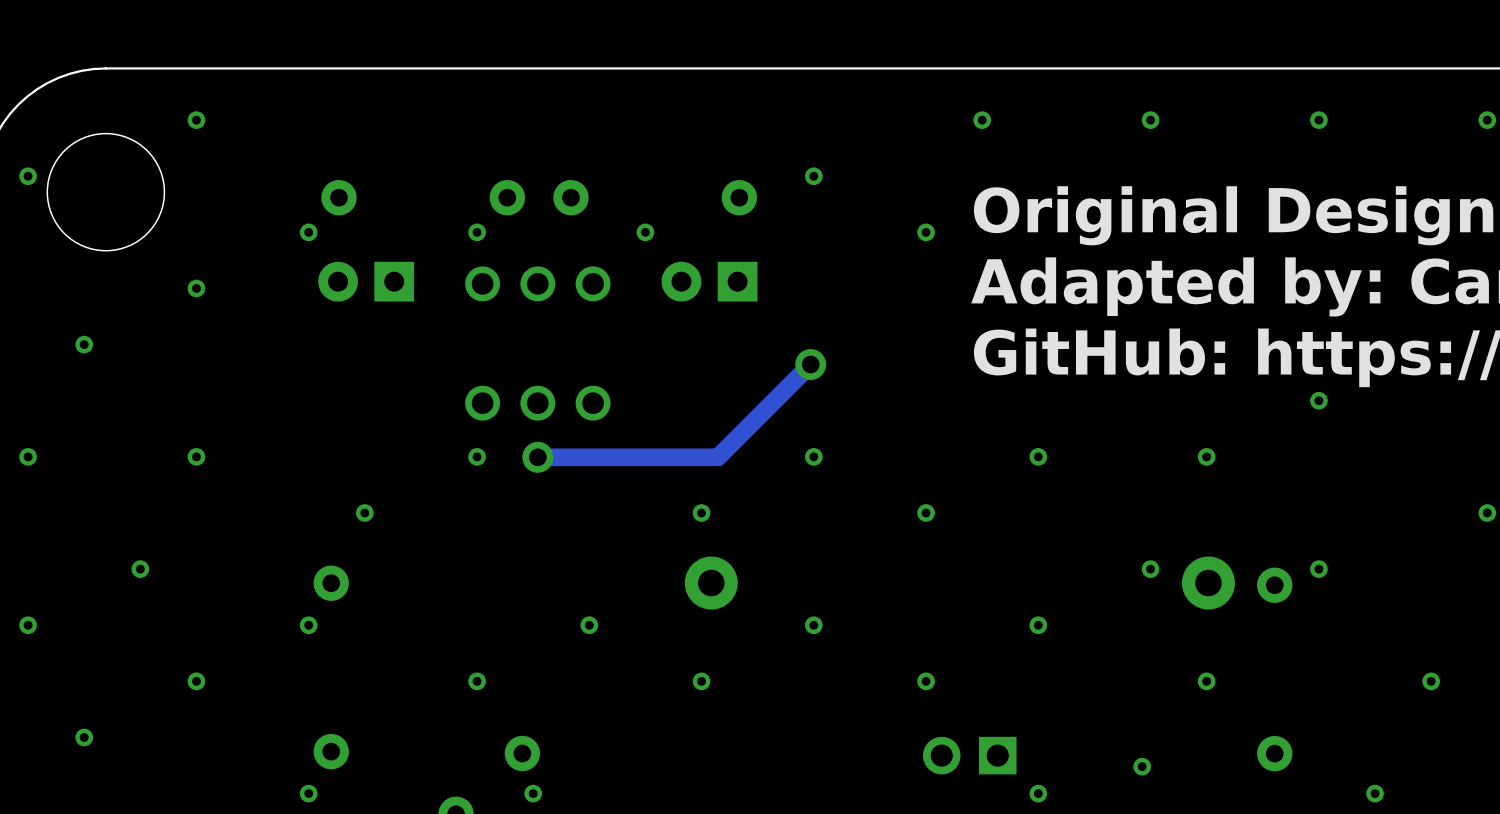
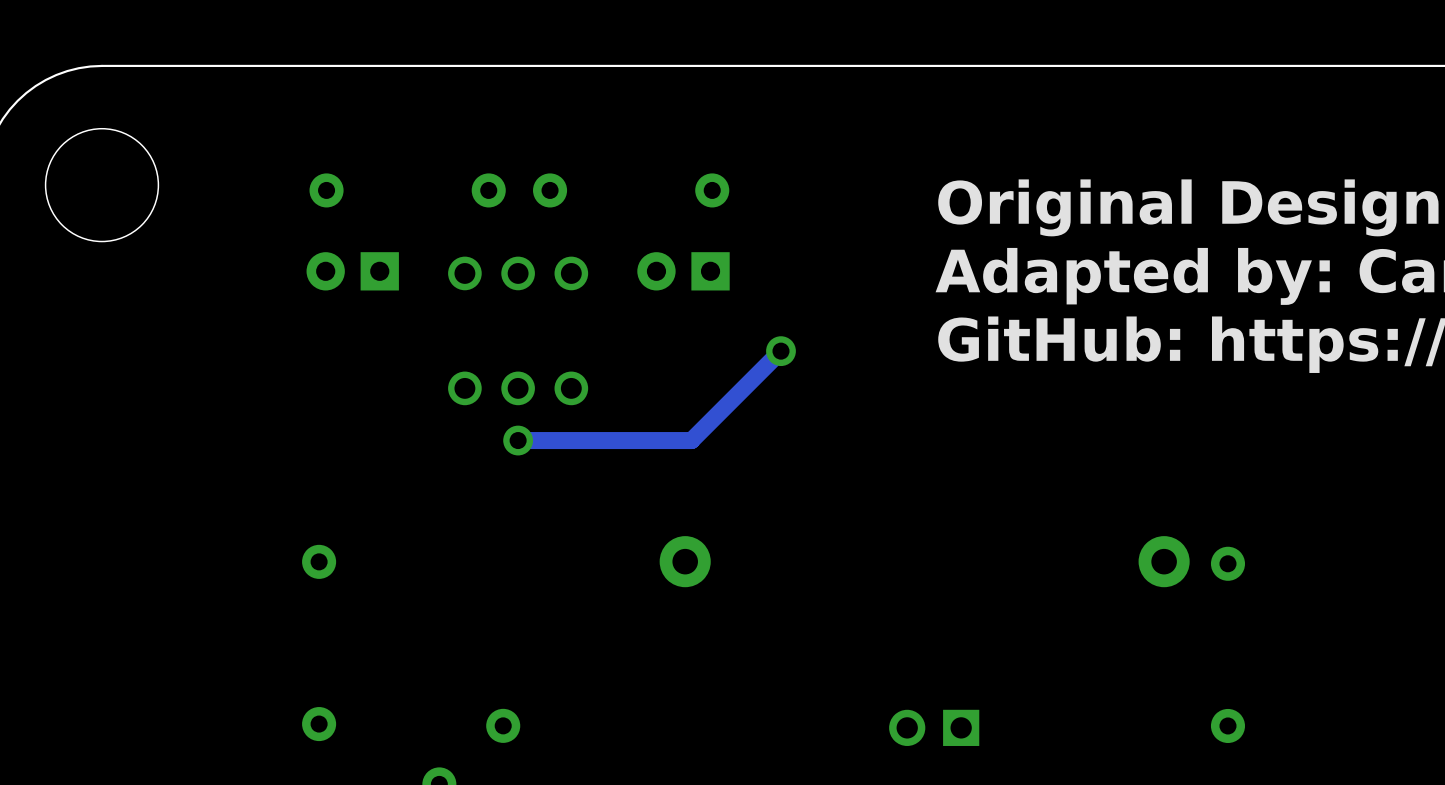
via: (196, 120) -> none
via: (982, 120) -> none
via: (1150, 120) -> none
via: (1318, 120) -> none
via: (1487, 120) -> none
via: (28, 176) -> none
via: (813, 176) -> none
via: (308, 232) -> none
via: (477, 232) -> none
via: (645, 232) -> none
via: (926, 232) -> none
via: (196, 288) -> none
via: (84, 344) -> none
via: (1318, 400) -> none
via: (28, 456) -> none
via: (196, 456) -> none
via: (477, 456) -> none
via: (813, 456) -> none
via: (1038, 456) -> none
via: (1206, 456) -> none
via: (364, 512) -> none
via: (701, 512) -> none
via: (926, 512) -> none
via: (1487, 512) -> none
via: (140, 569) -> none
via: (1150, 569) -> none
via: (1318, 569) -> none
via: (28, 625) -> none
via: (308, 625) -> none
via: (589, 625) -> none
via: (813, 625) -> none
via: (1038, 625) -> none
via: (196, 681) -> none
via: (477, 681) -> none
via: (701, 681) -> none
via: (926, 681) -> none
via: (1206, 681) -> none
via: (1431, 681) -> none
via: (84, 737) -> none
via: (1142, 766) -> none
via: (308, 793) -> none
via: (533, 793) -> none
via: (1038, 793) -> none
via: (1375, 793) -> none

